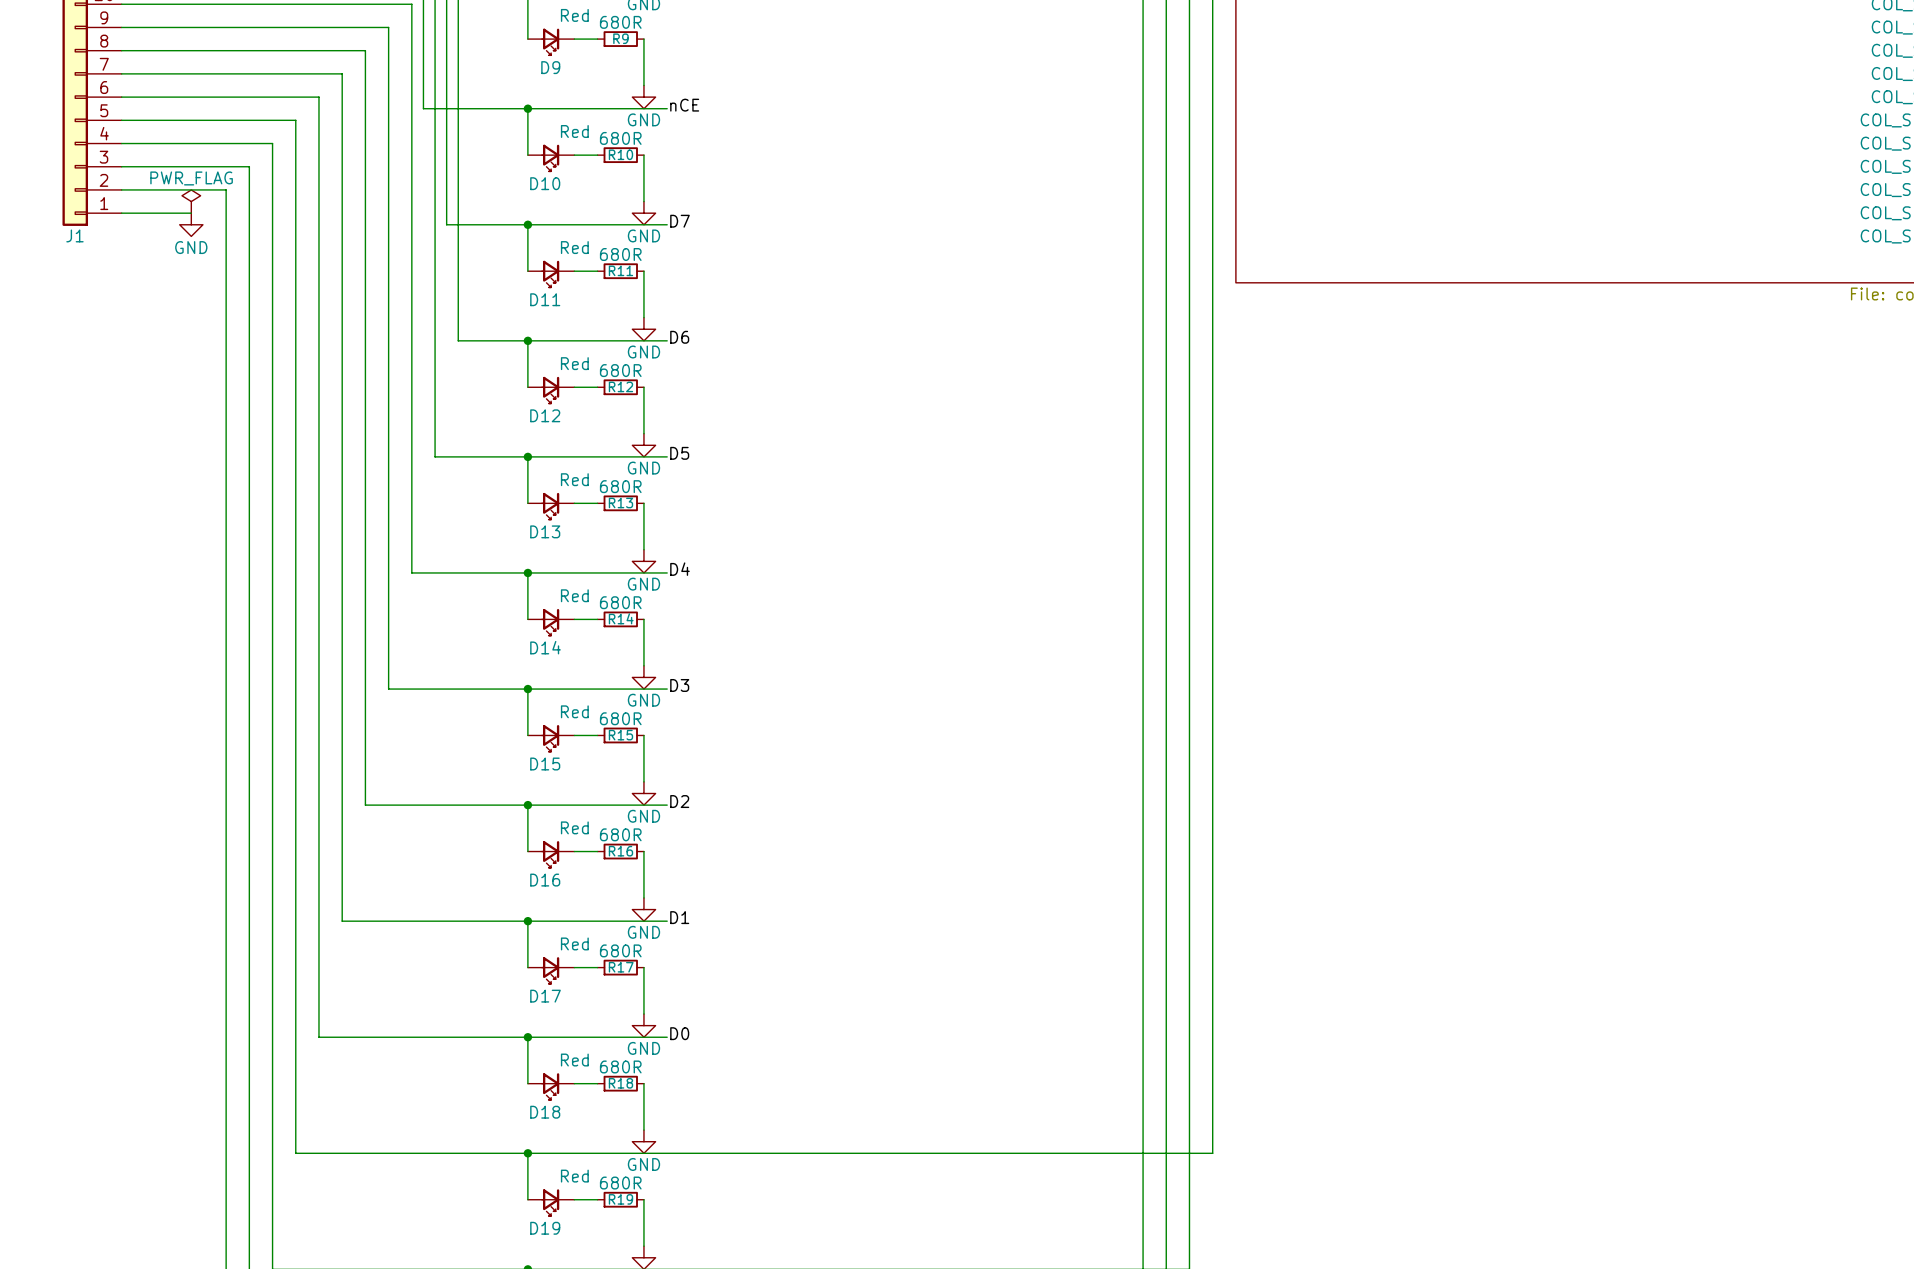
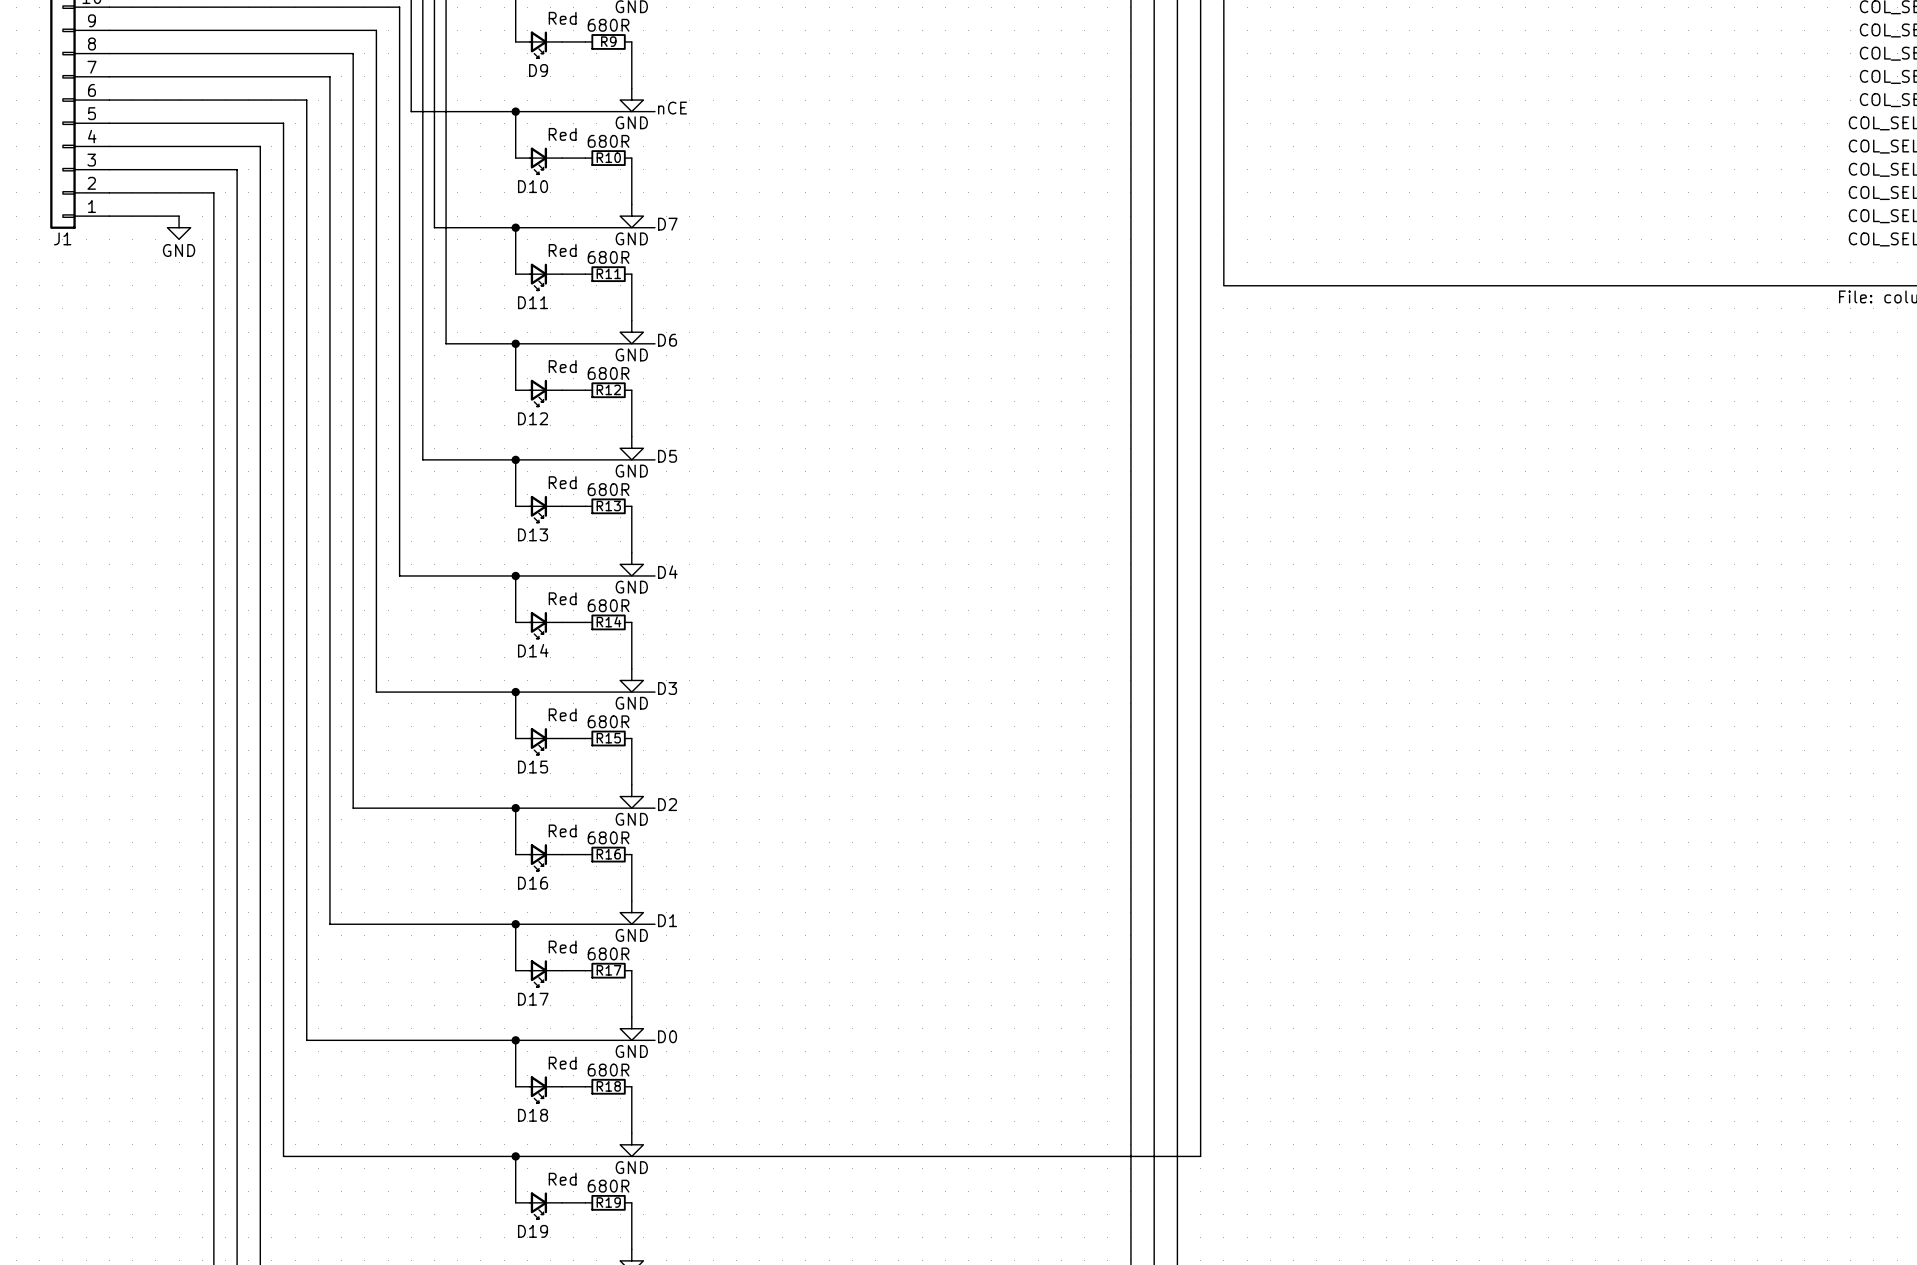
power symbol: PWR_FLAG (191, 201) -> none

